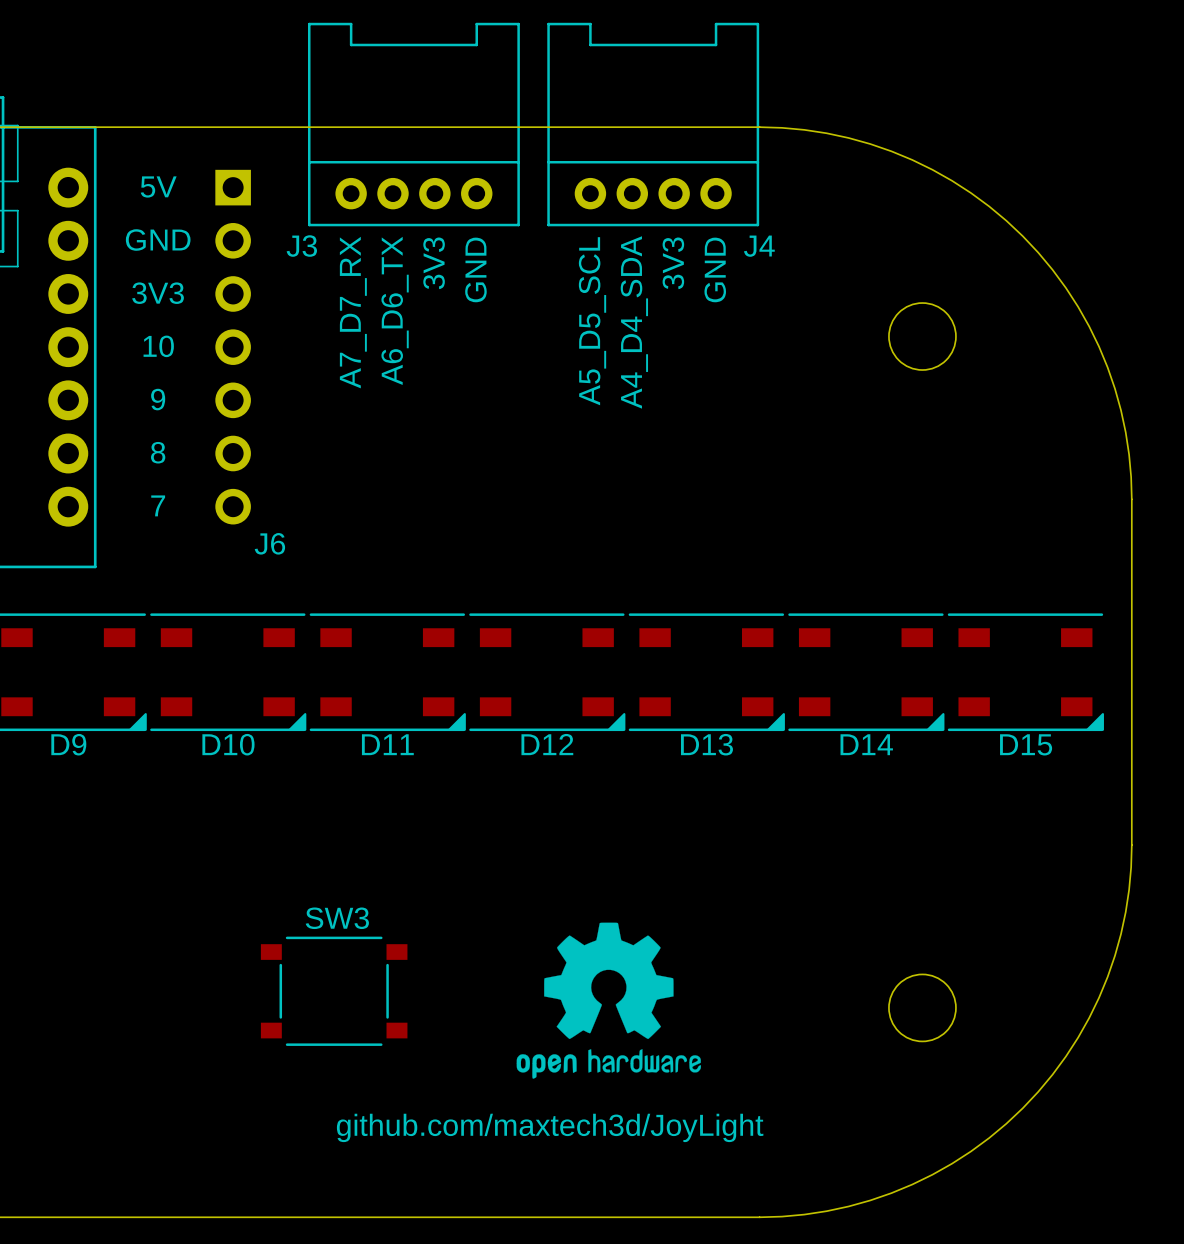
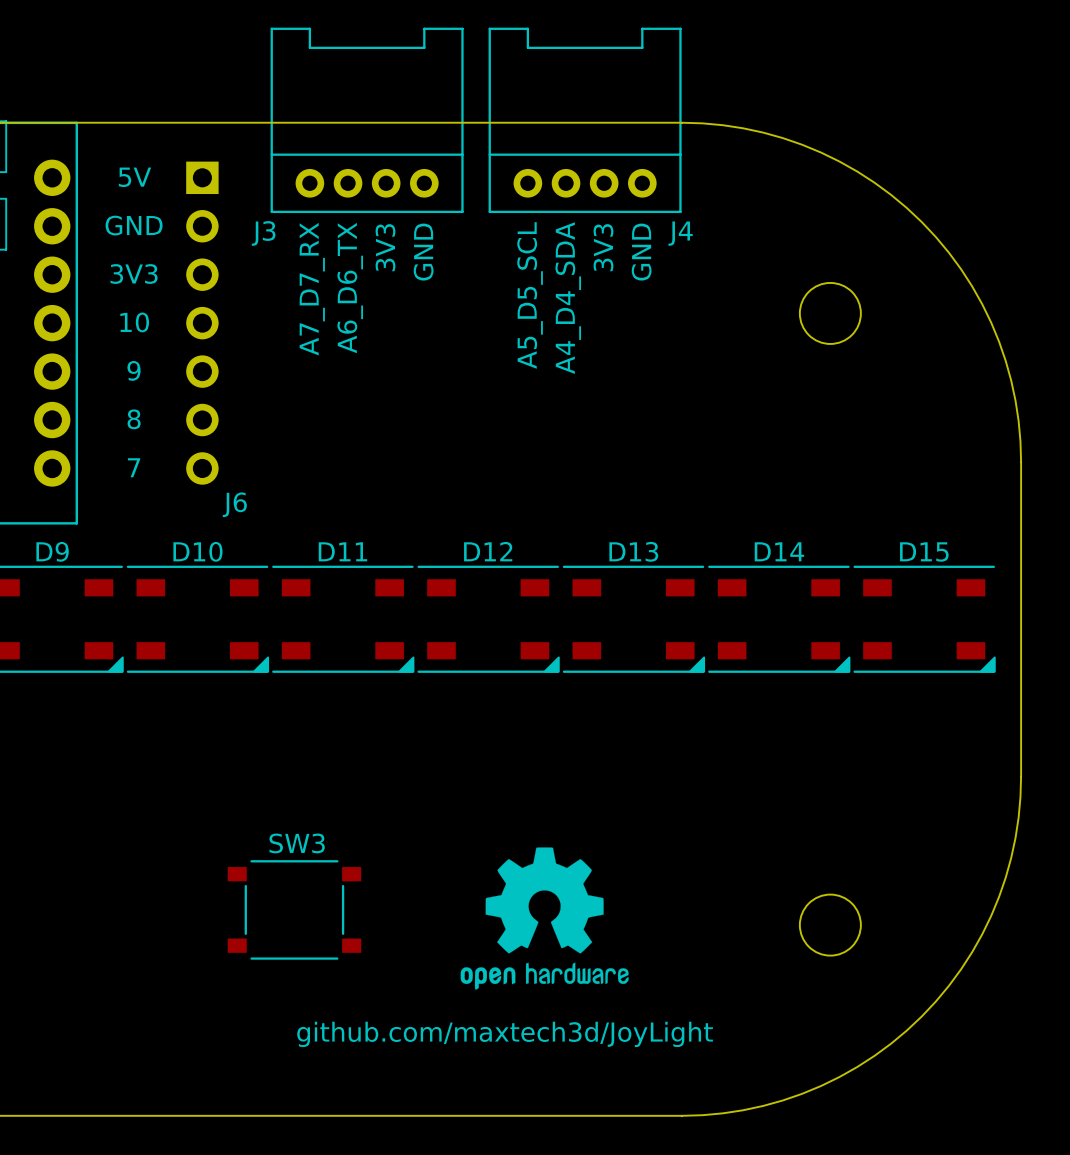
D9 name position: D9 (68, 744) -> D9 (52, 551)
D10 name position: D10 (228, 744) -> D10 (197, 551)
D11 name position: D11 (387, 744) -> D11 (342, 551)
D12 name position: D12 (547, 744) -> D12 (488, 551)
D13 name position: D13 (706, 744) -> D13 (633, 551)
D14 name position: D14 (866, 744) -> D14 (779, 551)
D15 name position: D15 (1026, 744) -> D15 (924, 551)

